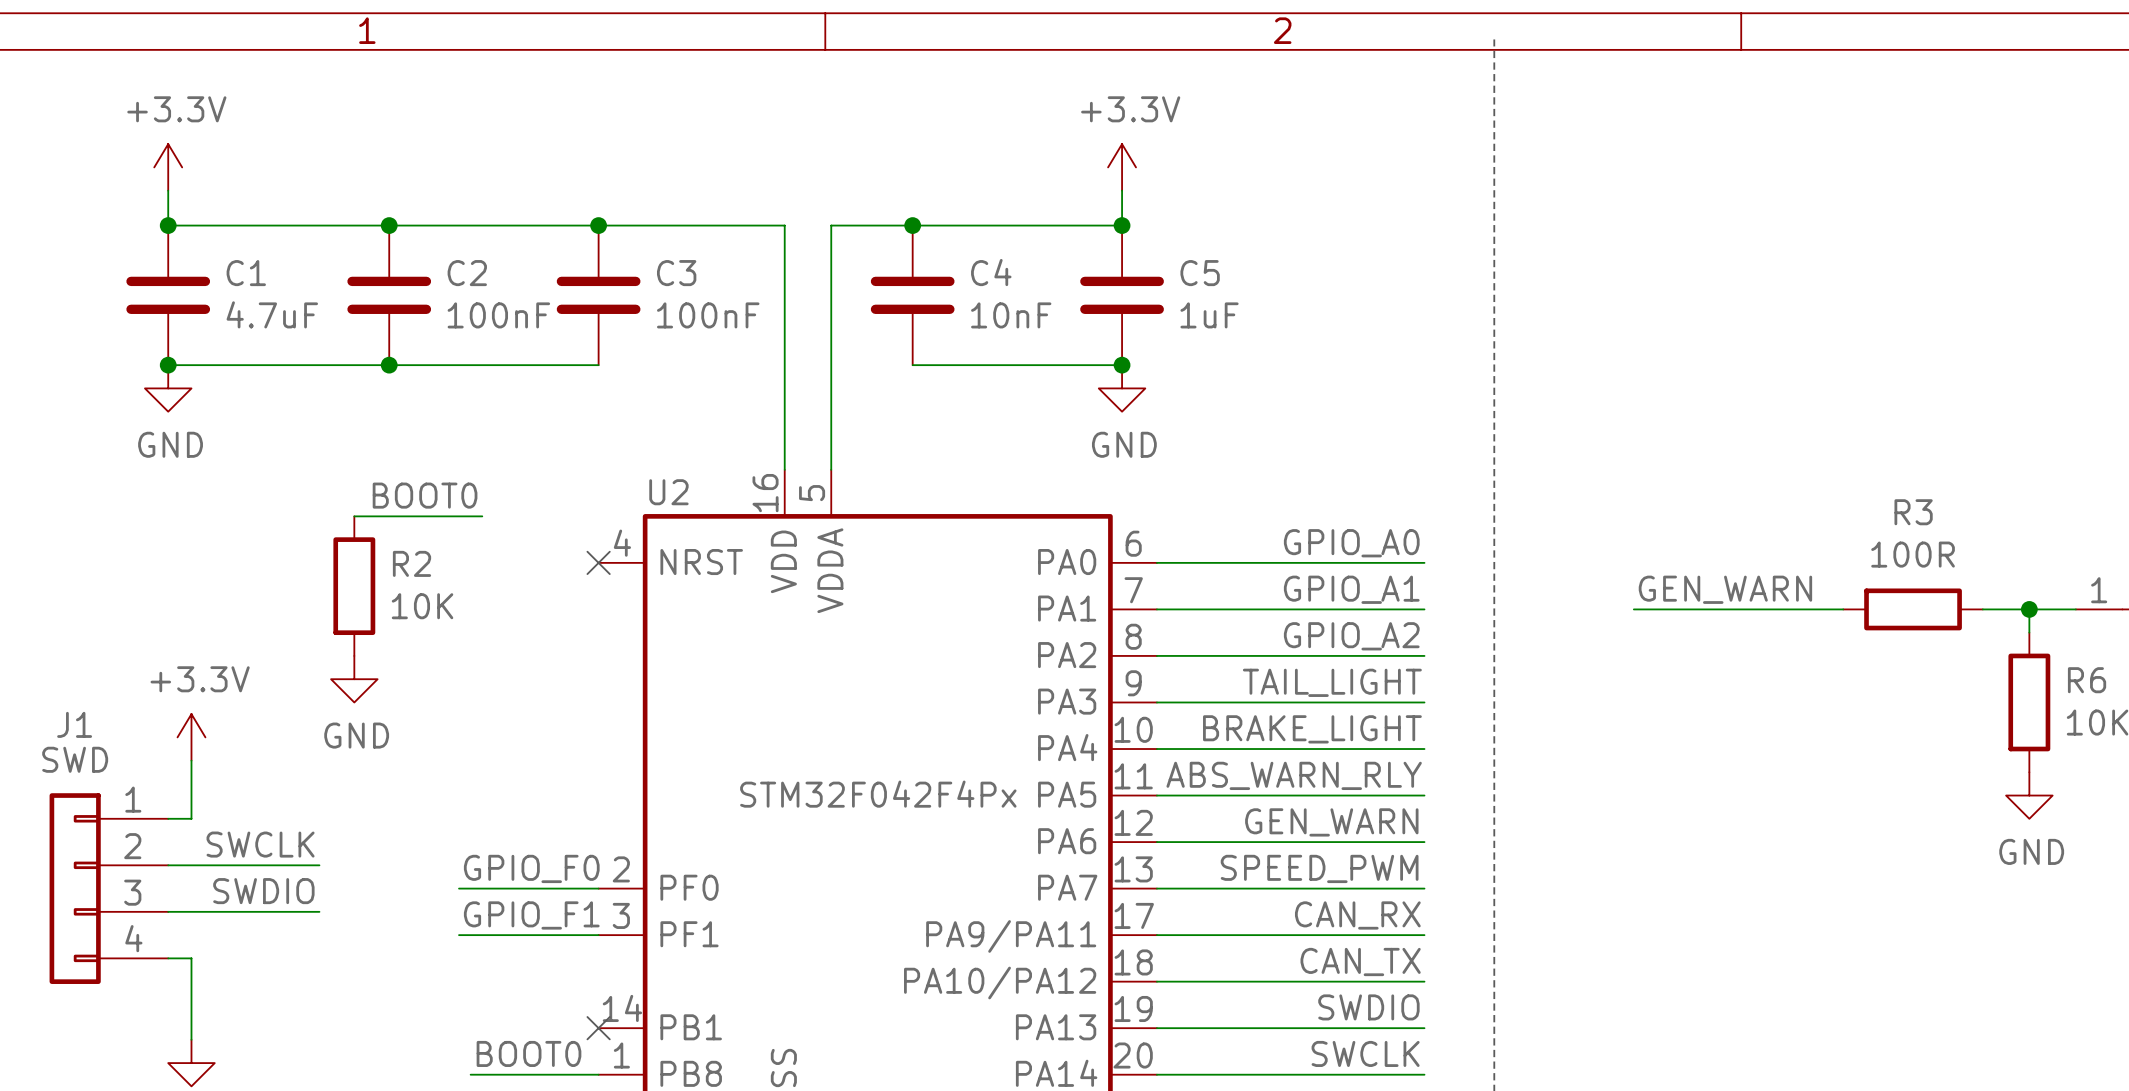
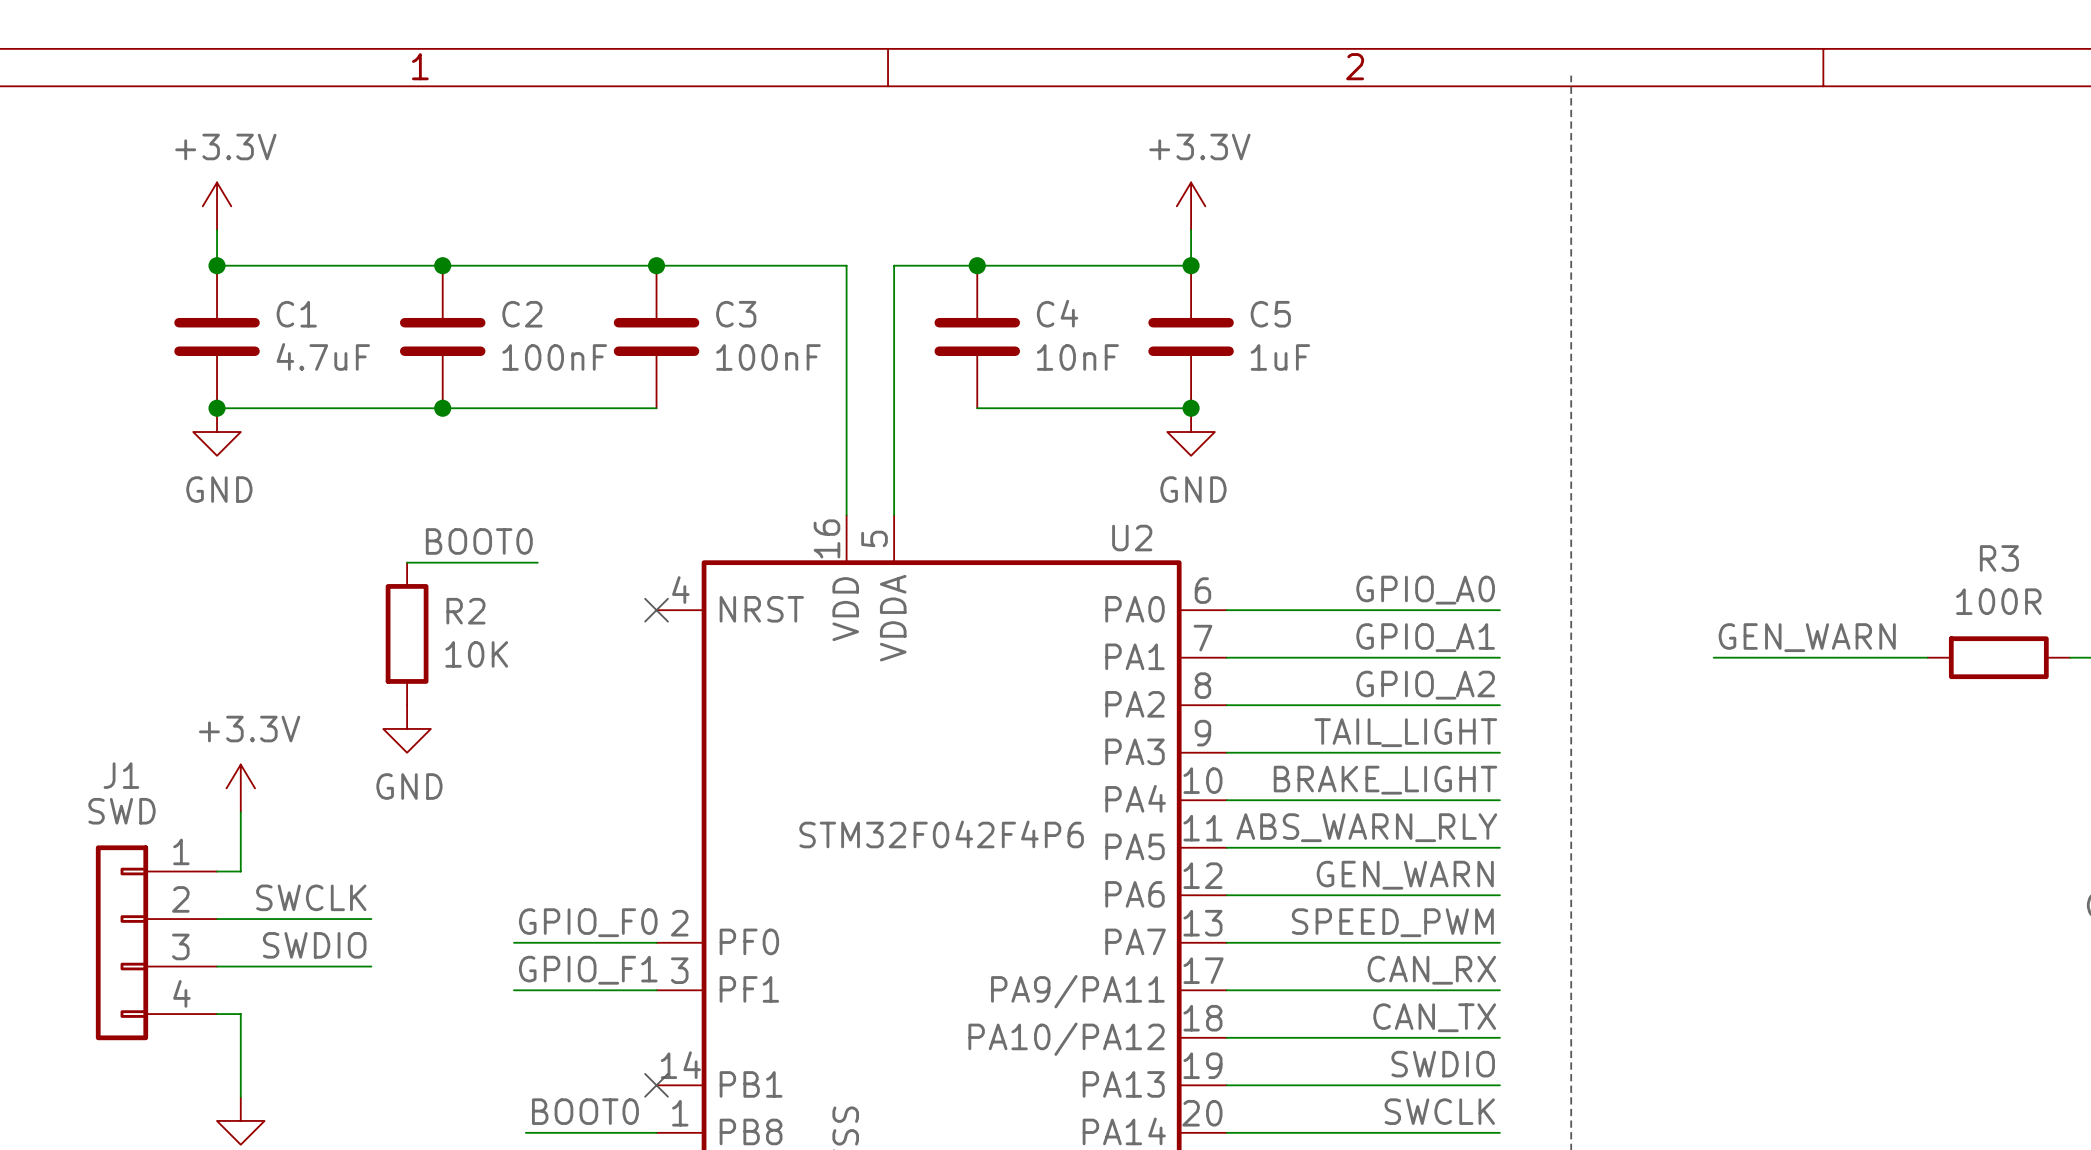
U2 name position: U2 (668, 492) -> U2 (1132, 538)
U2 value: STM32F042F4Px (878, 794) -> STM32F042F4P6 (941, 834)

